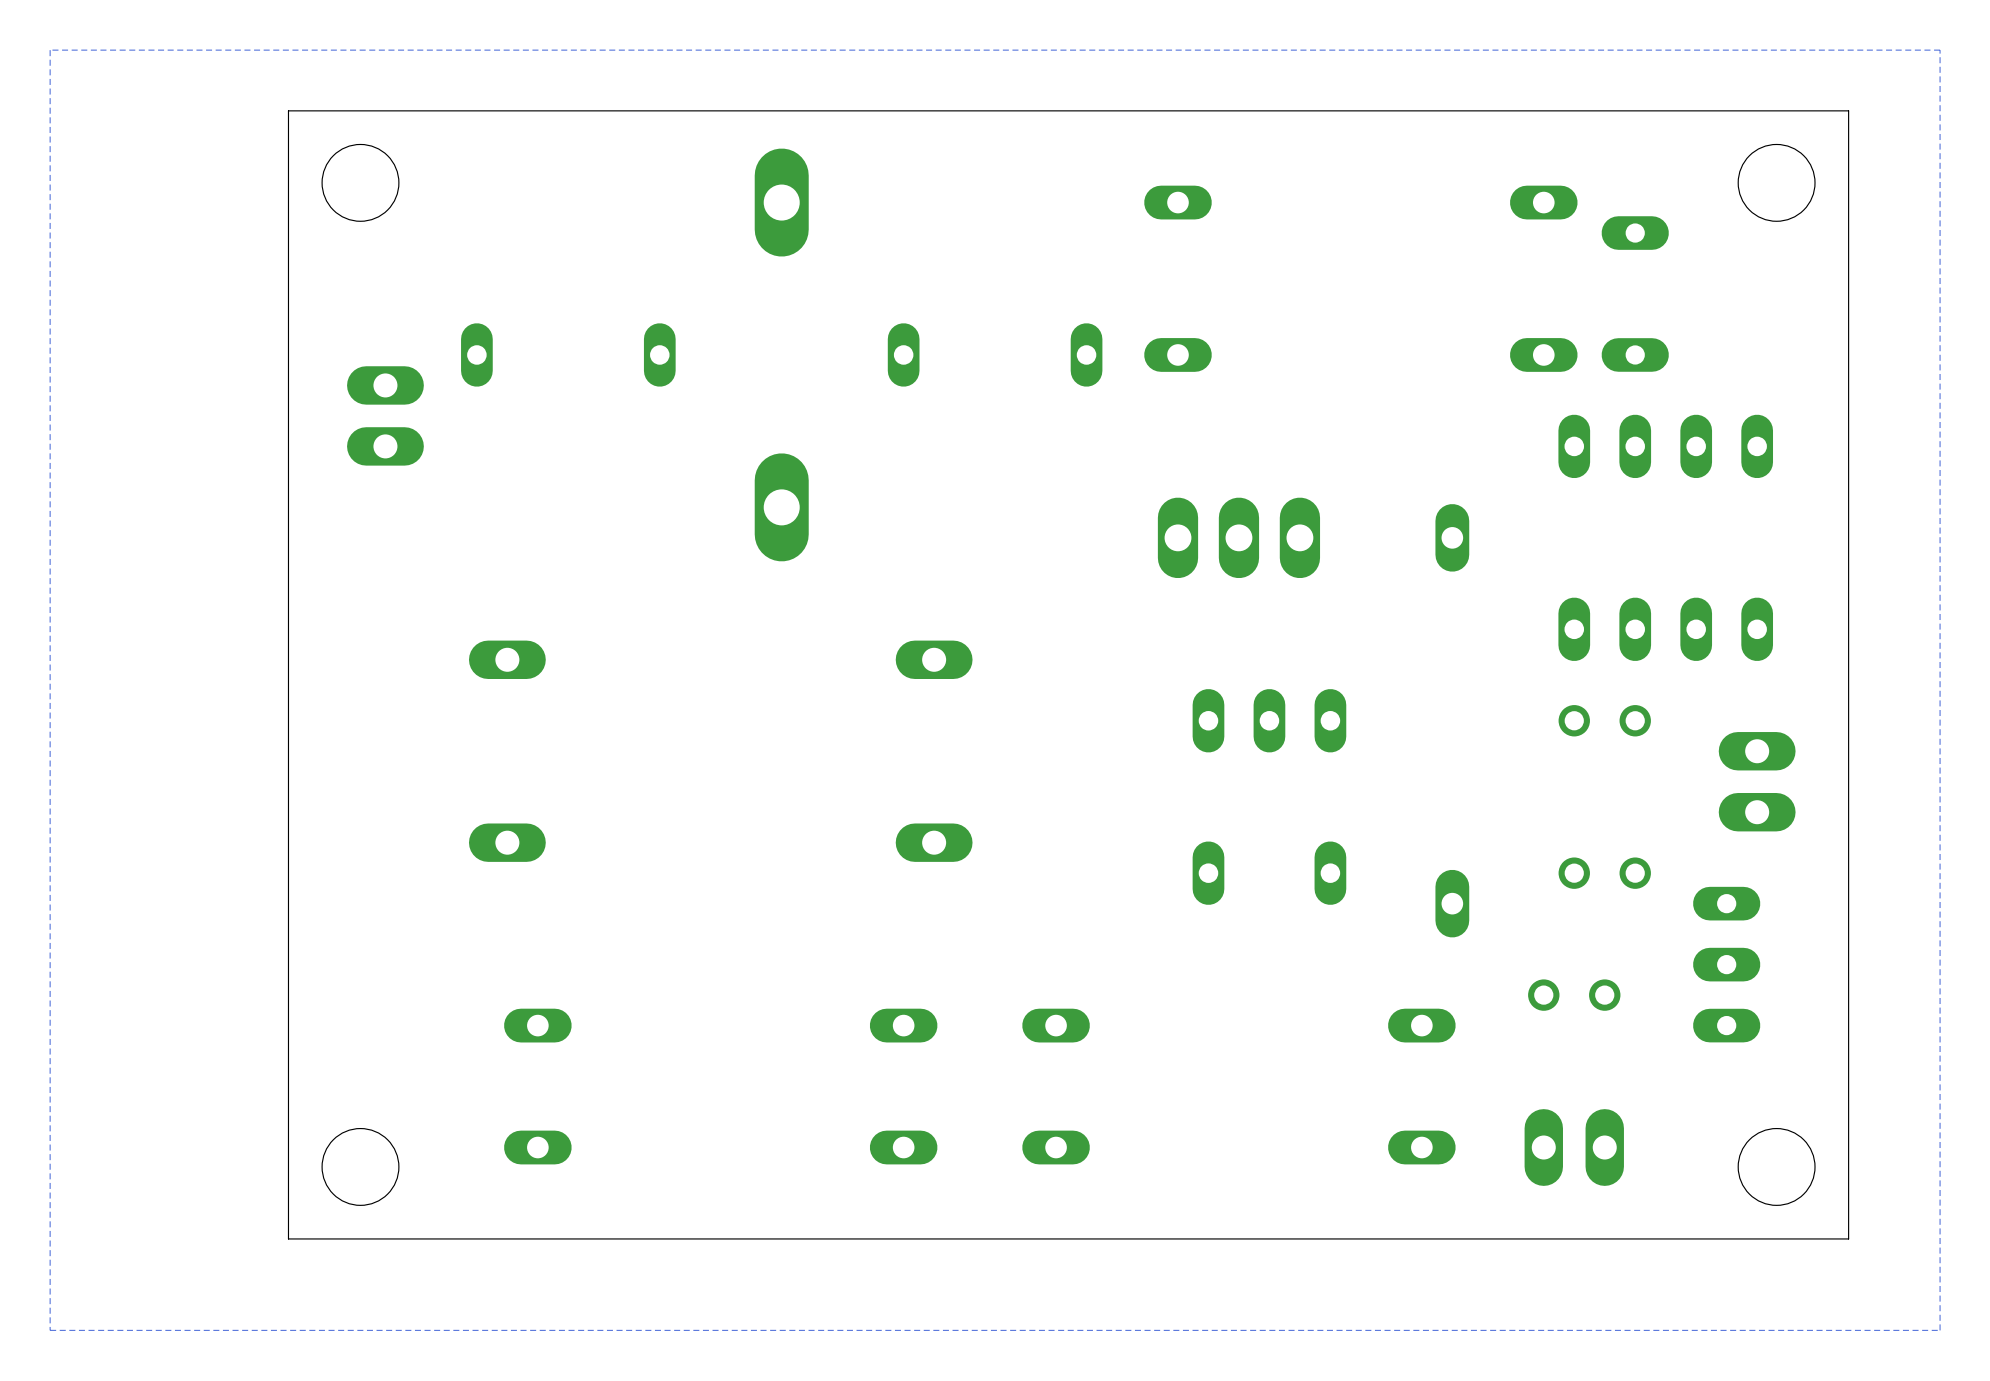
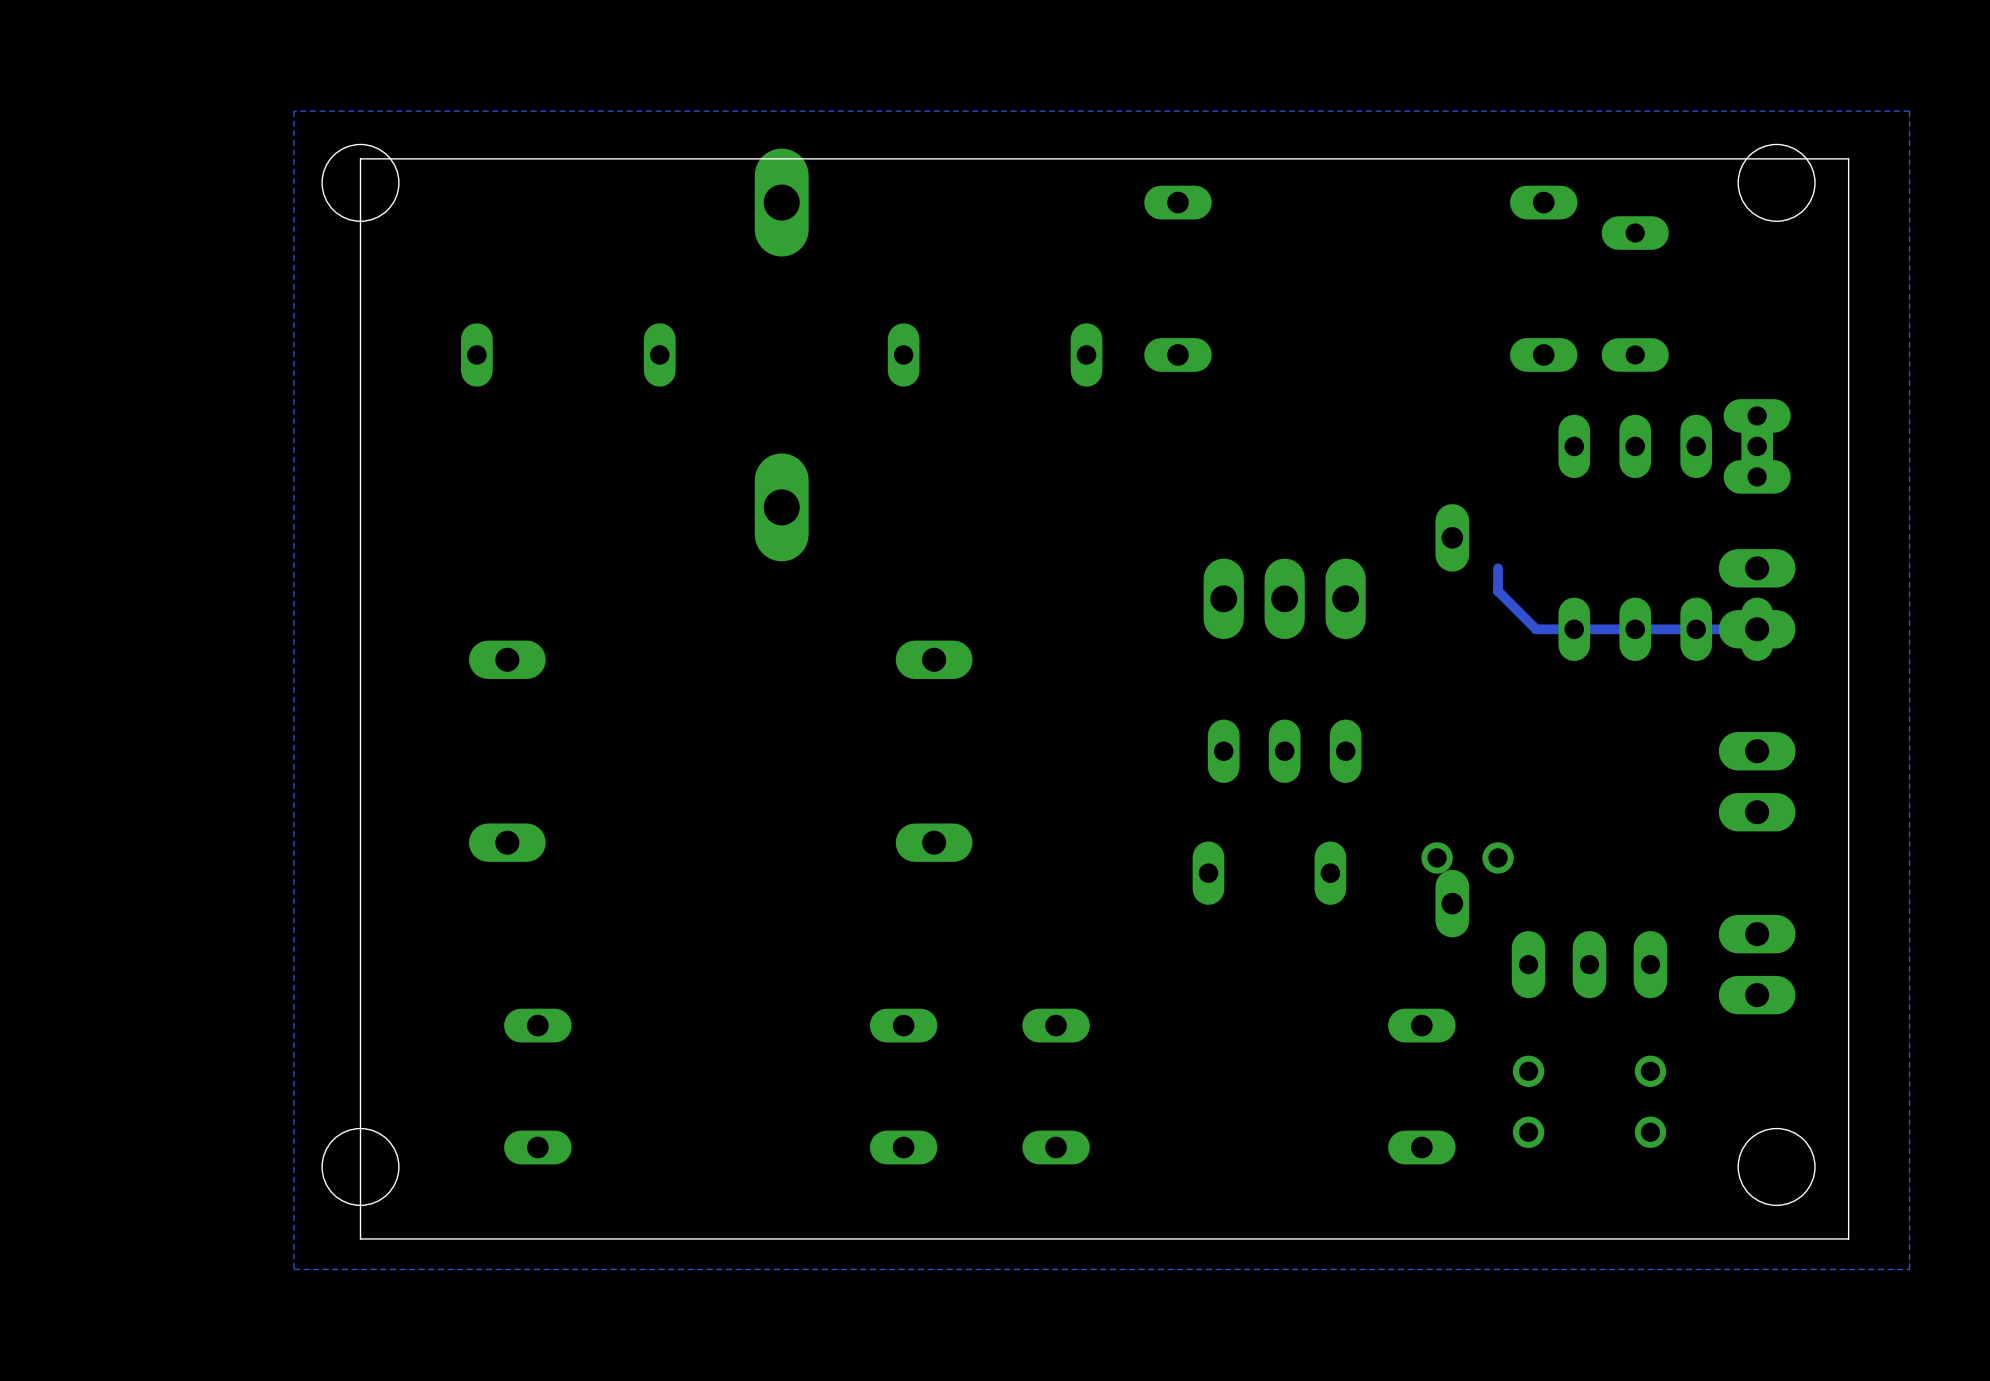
zone outline: (1940, 50) (50, 50) (50, 1330) (1940, 1330) (1940, 50) -> (1909, 111) (1909, 1269) (294, 1269) (294, 111) (1909, 111)
board edge: (1848, 158) (1848, 110) (288, 110) (288, 1238) (360, 1238) -> (1848, 158) (360, 158) (360, 1238)
part: (385, 415) -> none
part: none -> (1757, 446)
part position: (1238, 537) -> (1284, 598)
track: none -> (1498, 568) (1498, 591) (1536, 629) (1757, 629)
part: none -> (1757, 598)
part position: (1269, 720) -> (1284, 751)
part: (1604, 720) -> none
part: none -> (1467, 857)
part: (1604, 873) -> none
part rotation: 0° (1726, 964) -> 90° clockwise (1589, 964)
part position: (1726, 964) -> (1589, 964)
part: (1574, 995) -> none
part: none -> (1528, 1101)
part: none -> (1650, 1101)
part rotation: 0° (1574, 1147) -> 90° clockwise (1757, 964)
part position: (1574, 1147) -> (1757, 964)

